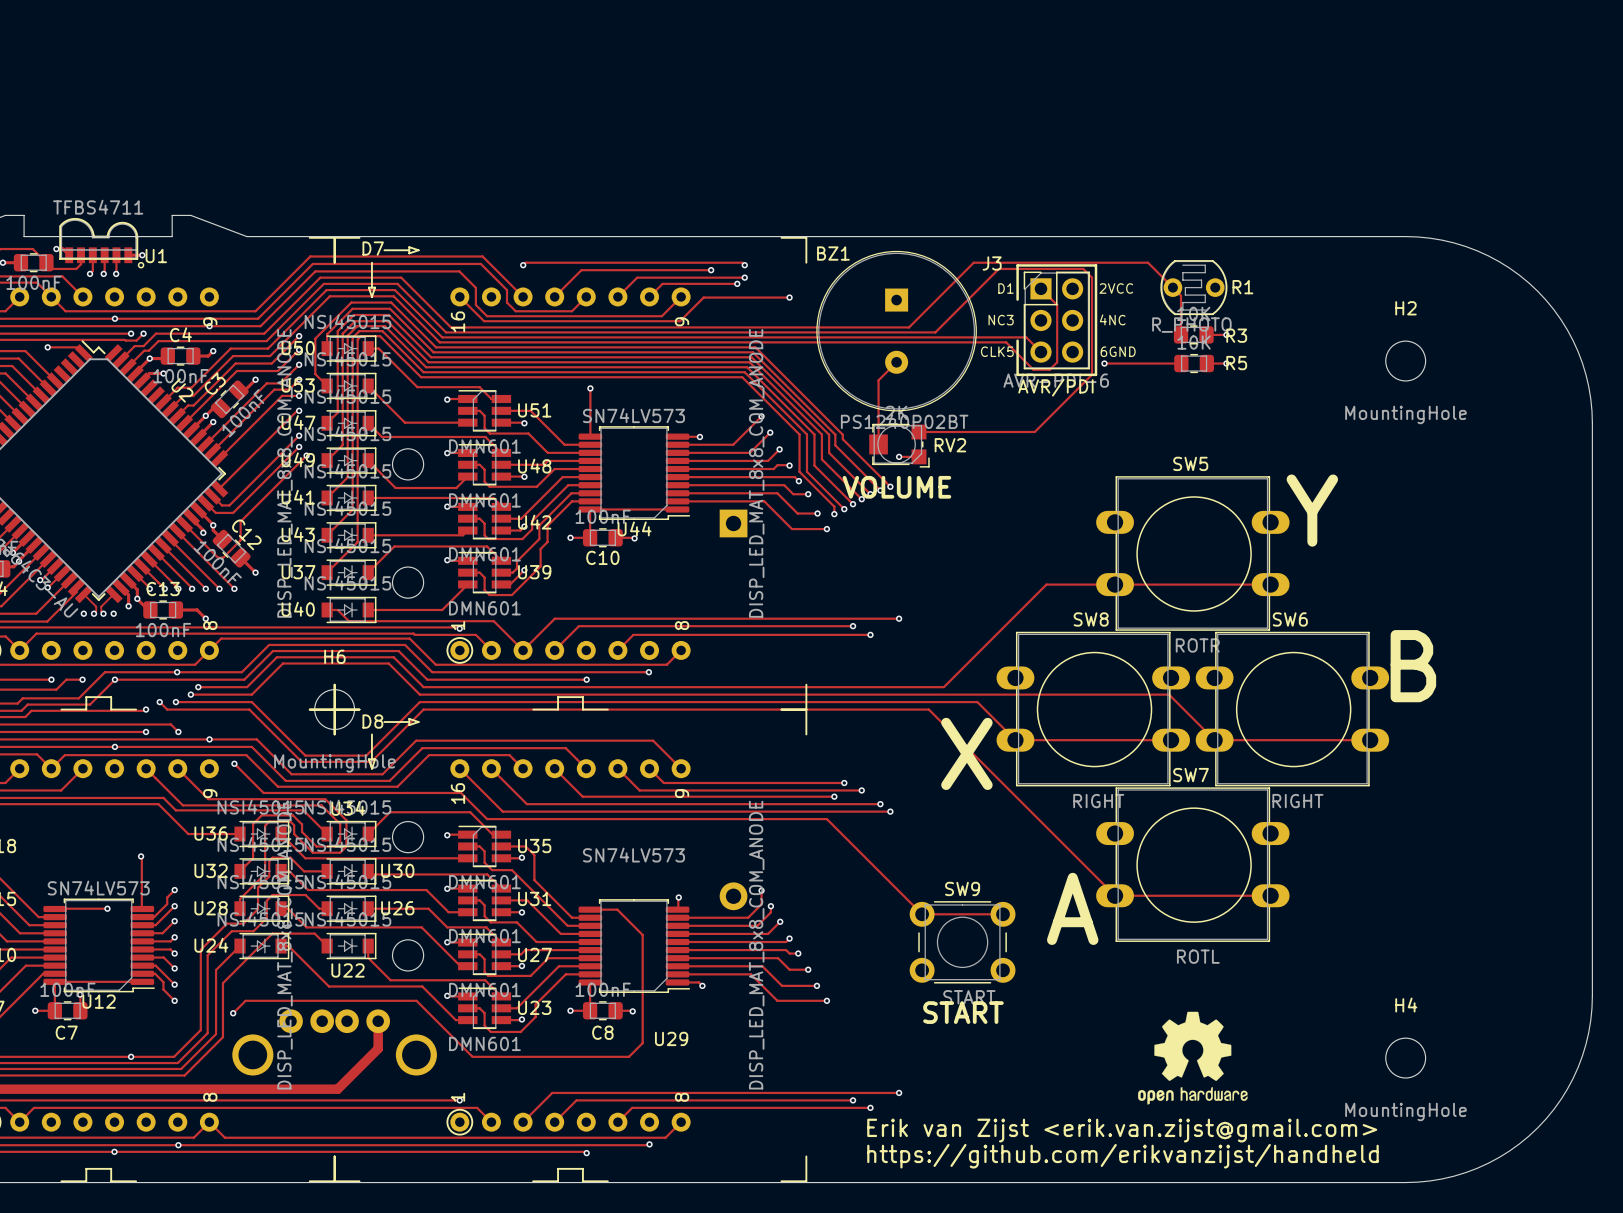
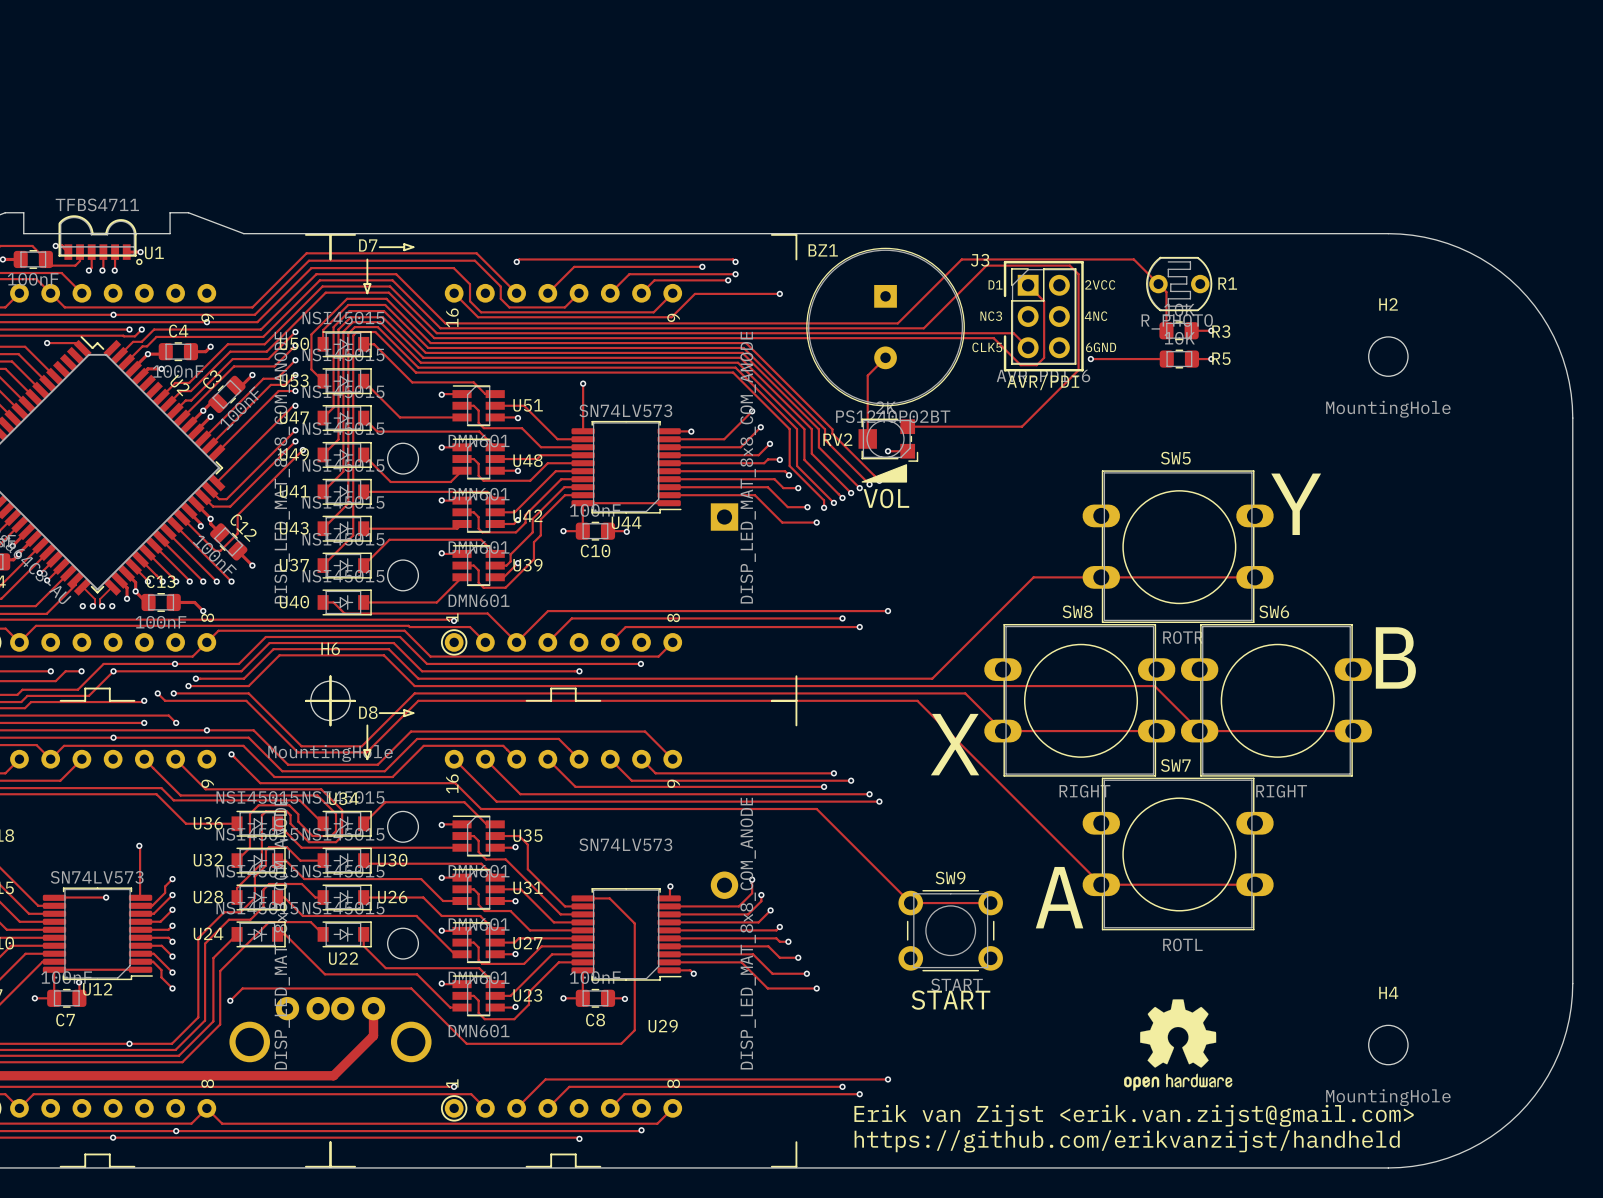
RV2 name position: RV2 (950, 445) -> RV2 (837, 439)
drawing: none -> [861, 464, 908, 483]
text: VOLUME (896, 487) -> VOL (886, 498)

